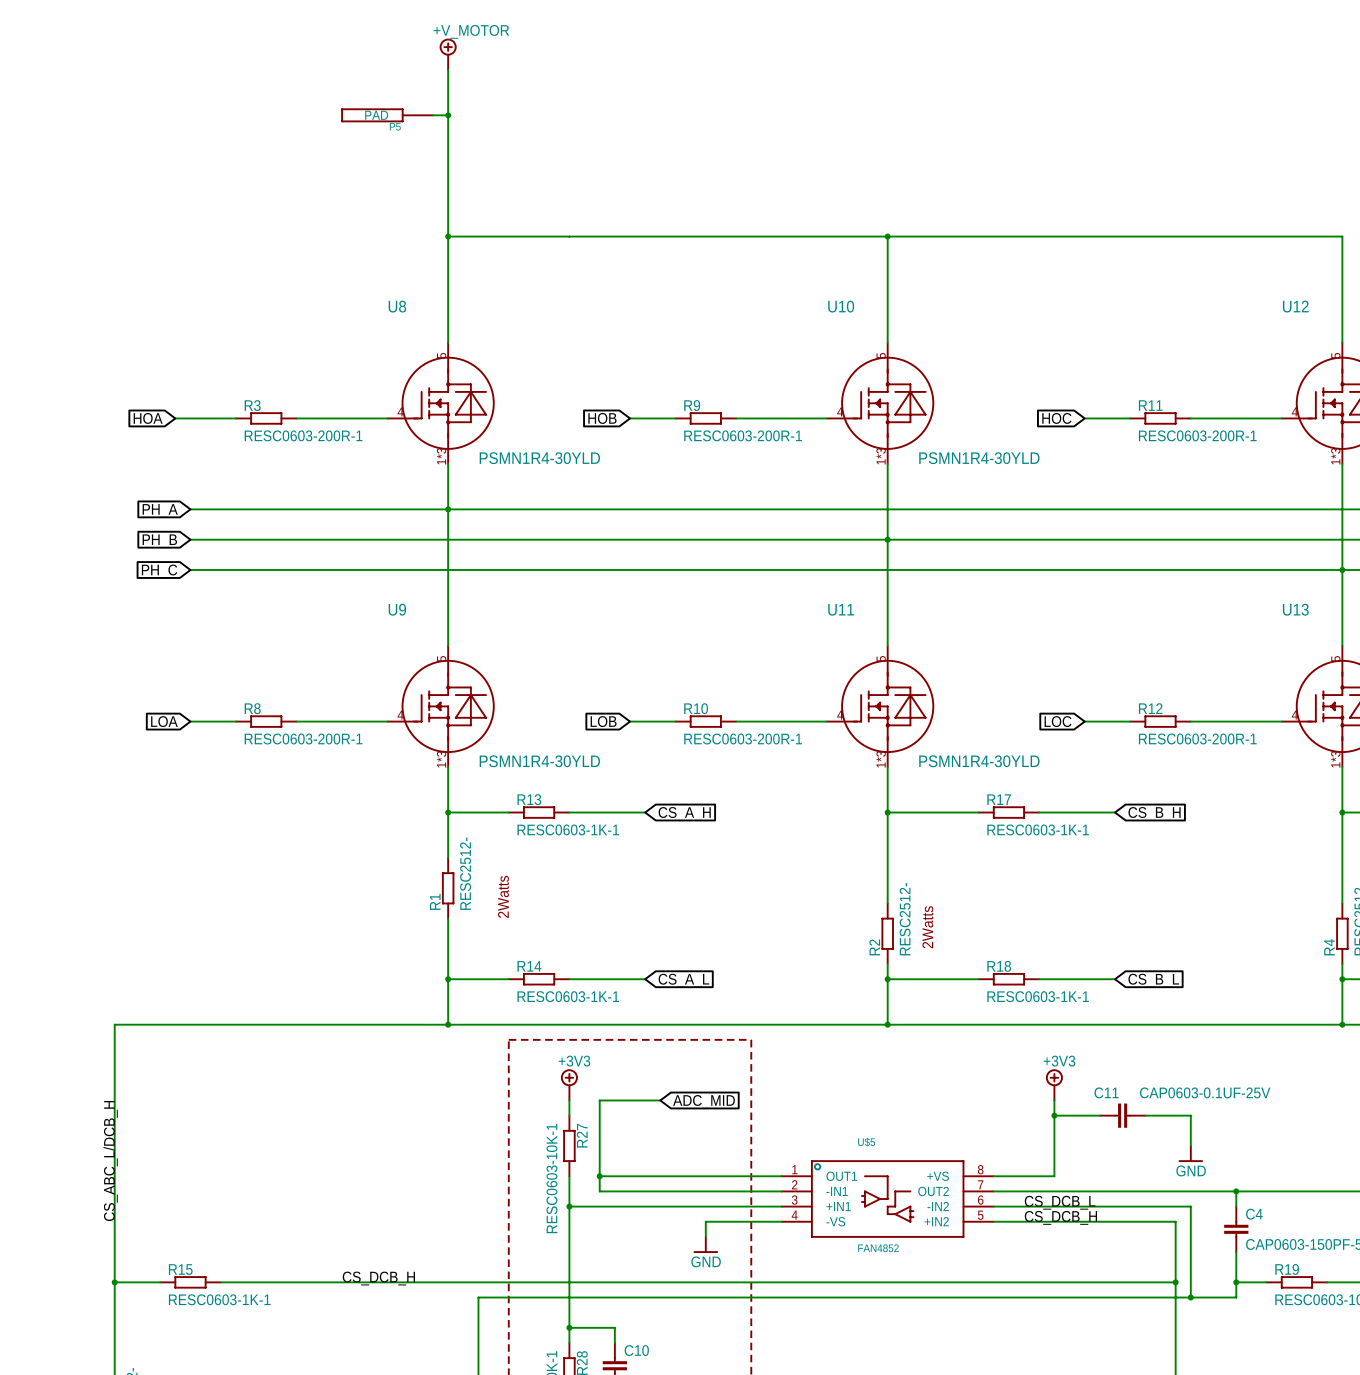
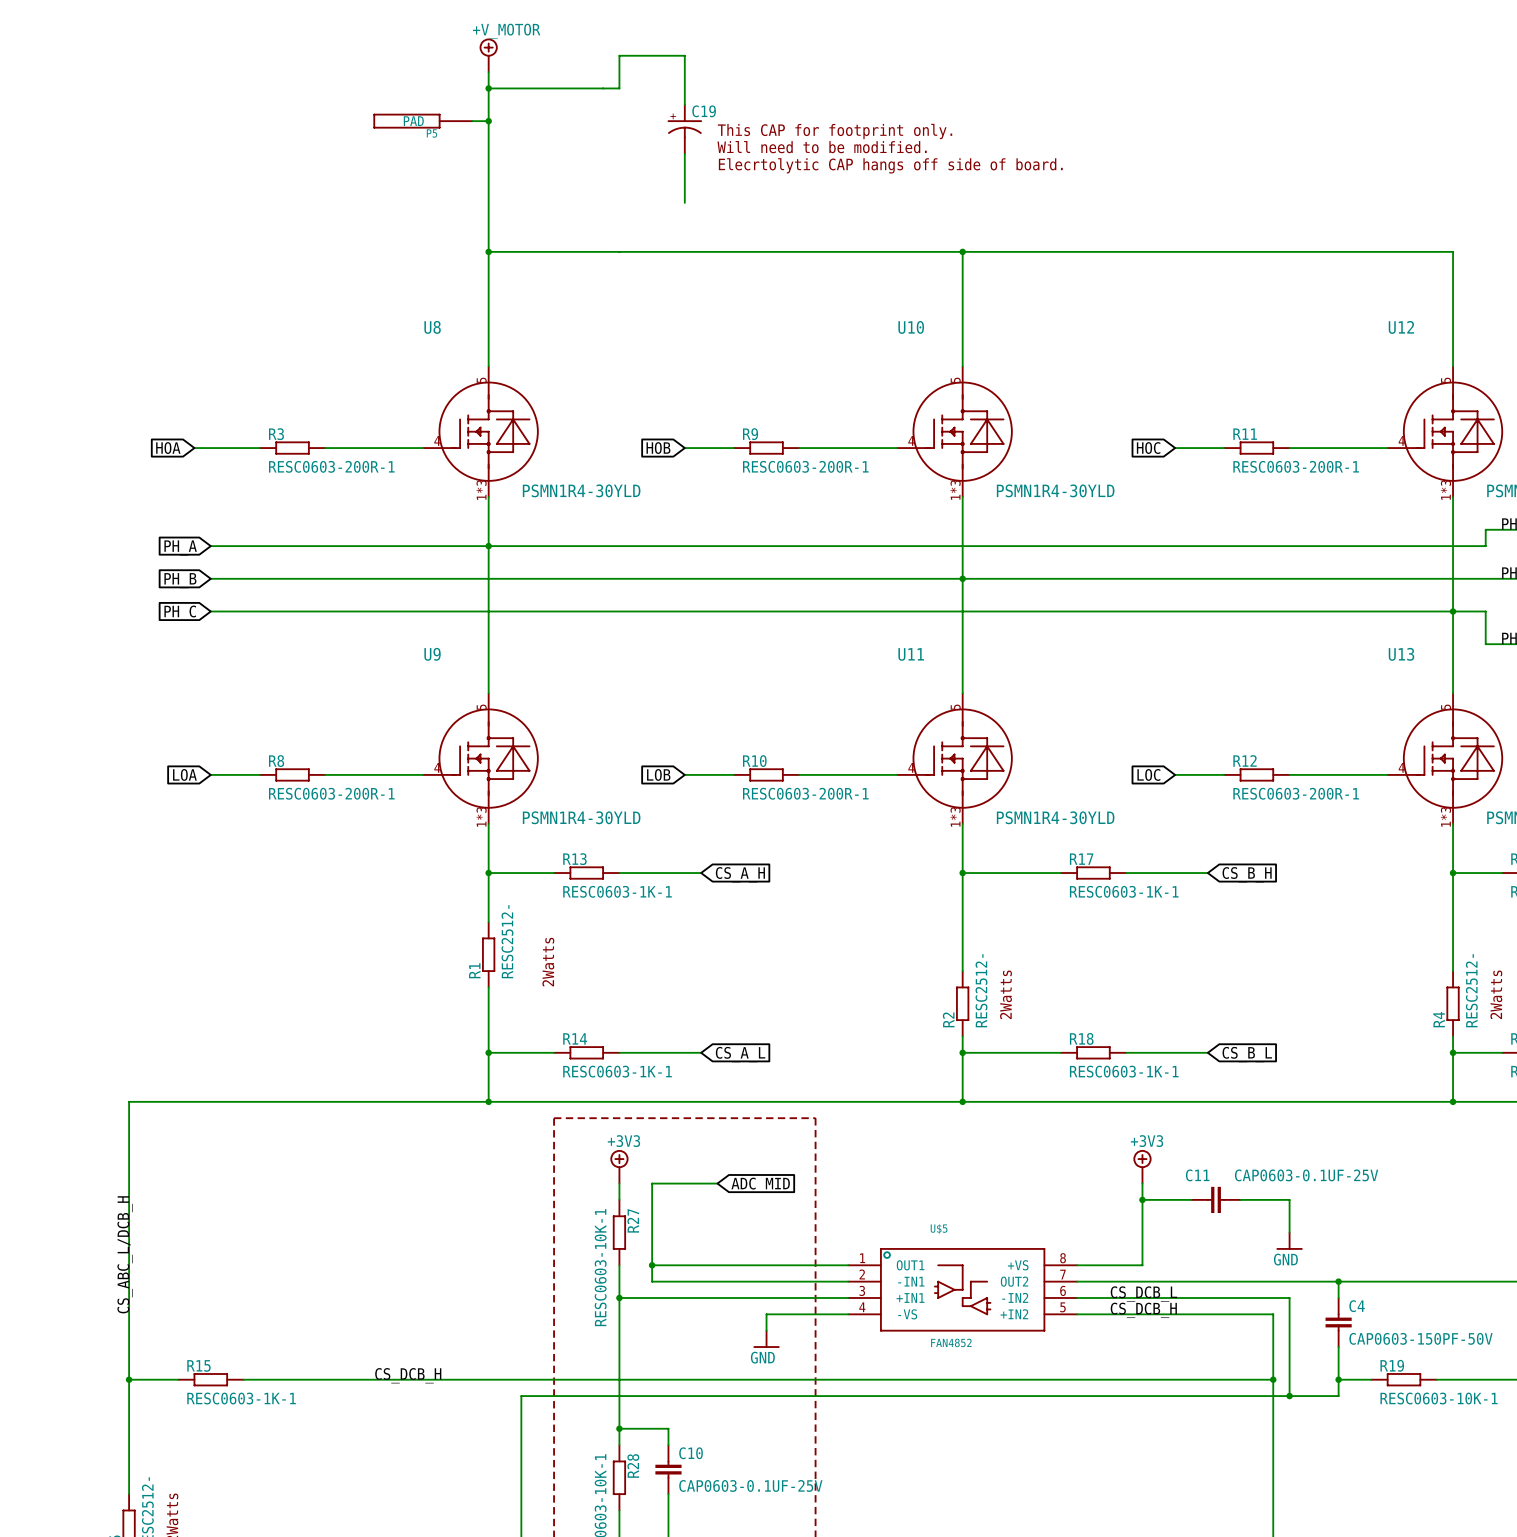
wire: none -> (488, 88) (619, 88) (619, 55) (684, 55) (684, 104)
junction: none -> (488, 88)
C19: none -> (684, 129)
text: none -> This CAP for footprint only. (835, 131)
text: none -> Will need to be modified. (822, 147)
wire: none -> (684, 153) (684, 202)
text: none -> Elecrtolytic CAP hangs off side of board. (890, 165)

